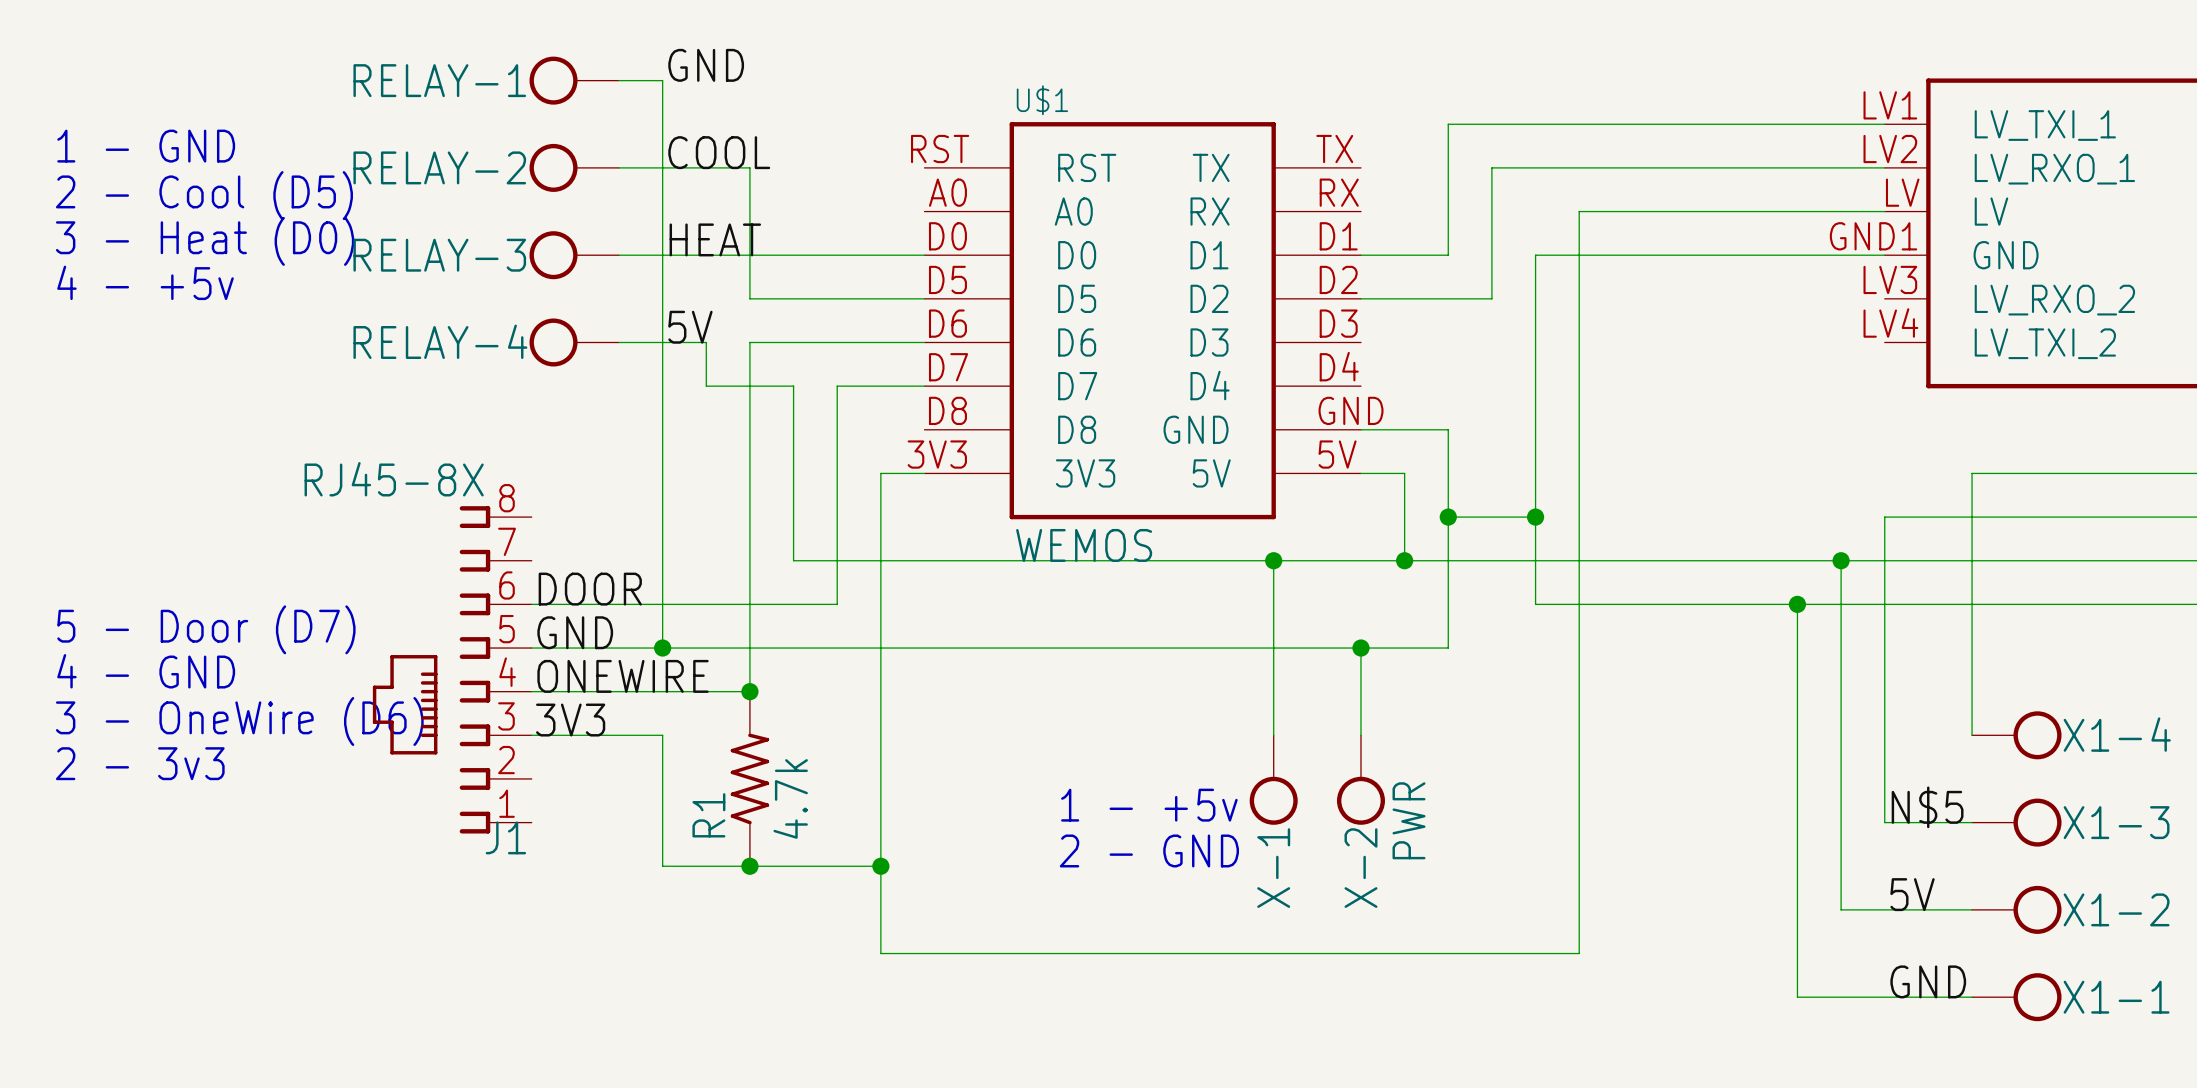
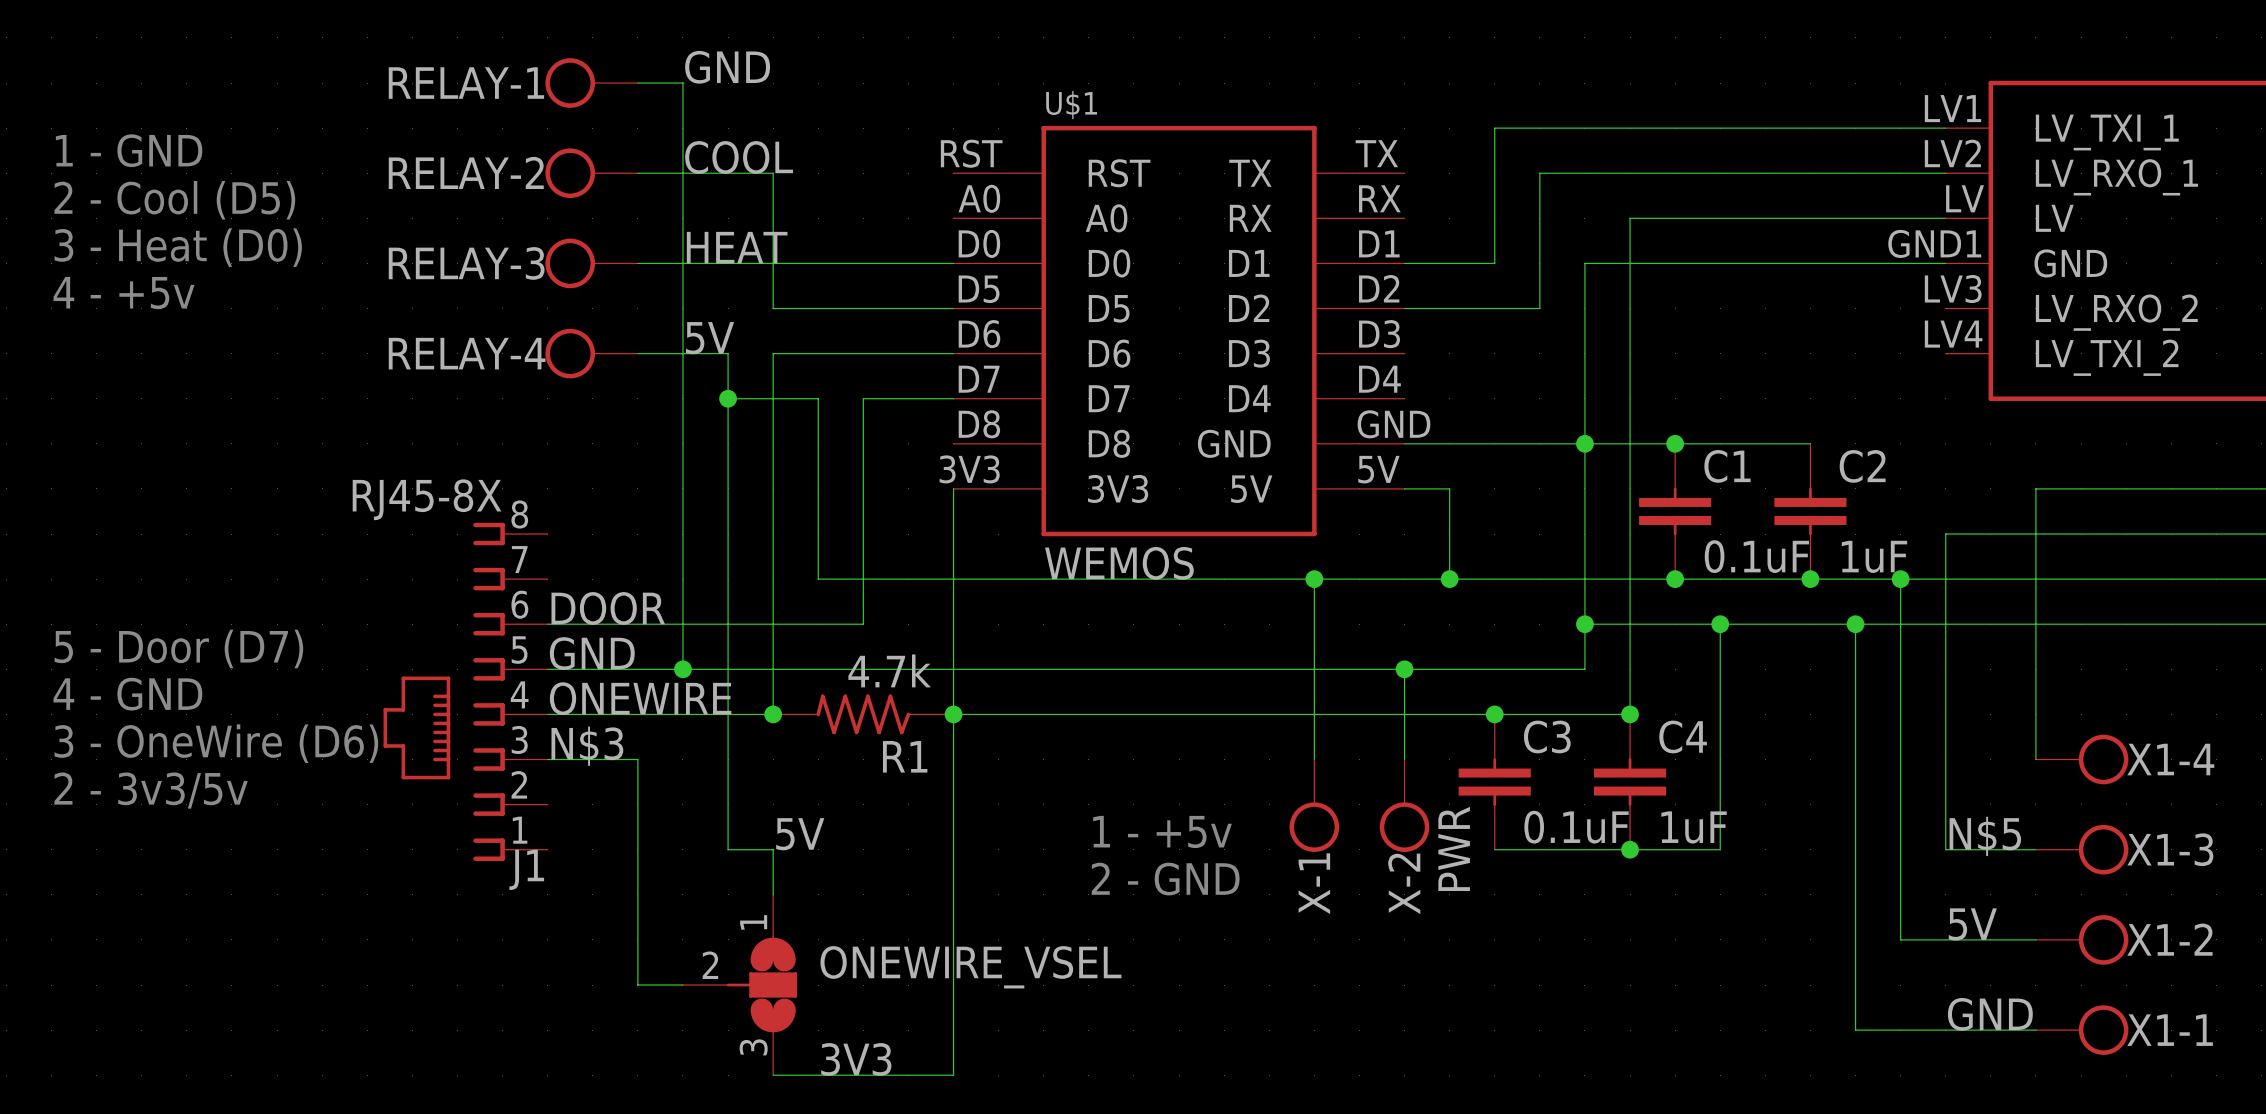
wire: none -> (728, 398) (728, 849) (773, 849) (773, 894)
junction: none -> (728, 398)
wire: (1448, 429) (1448, 648) -> (1584, 624) (1584, 669) (1494, 669)
wire: none -> (1494, 443) (1810, 443)
junction: none -> (1584, 443)
junction: none -> (1675, 443)
wire: (924, 473) (880, 473) (880, 953) (1579, 953) (1579, 691) -> (953, 714) (1630, 714)
wire: none -> (953, 488) (953, 1075) (773, 1075)
C1: none -> 0.1uF (1675, 511)
C2: none -> 1uF (1810, 511)
wire: (1448, 517) (1535, 517) -> none
junction: (1448, 517) -> none
junction: (1535, 517) -> none
junction: none -> (1675, 579)
junction: none -> (1810, 579)
junction: none -> (1584, 624)
wire: none -> (1720, 624) (1720, 849) (1494, 849)
junction: none -> (1720, 624)
junction: none -> (953, 714)
junction: none -> (1494, 714)
junction: none -> (1630, 714)
label: 3V3 (570, 720) -> N$3 (587, 746)
wire: (619, 735) (662, 735) (662, 866) (880, 866) -> (637, 759) (637, 985) (682, 985)
C3: none -> 0.1uF (1494, 782)
C4: none -> 1uF (1630, 782)
text: 2 - 3v3 (140, 763) -> 2 - 3v3/5v (151, 790)
R1 rotation: 0° (749, 778) -> 90° counterclockwise (863, 714)
R1 position: (749, 778) -> (863, 714)
label: none -> 5V (800, 834)
junction: none -> (1630, 849)
junction: (749, 866) -> none
junction: (880, 866) -> none
ONEWIRE_VSEL: none -> (740, 985)
label: none -> 3V3 (856, 1059)

